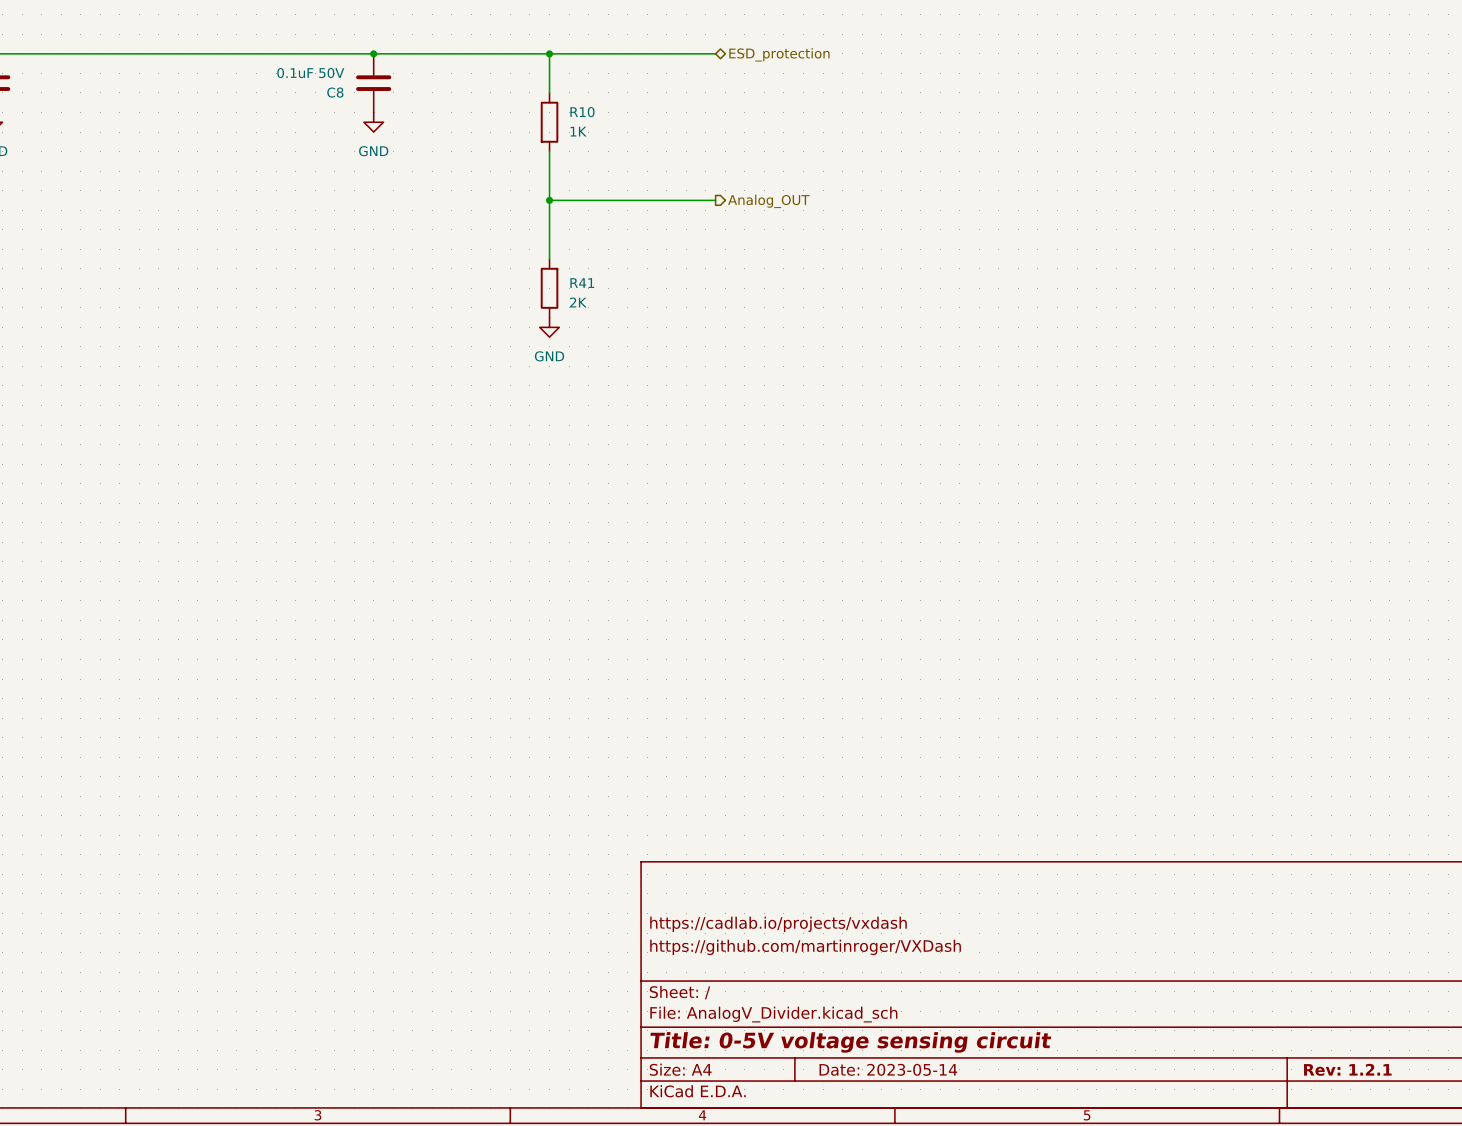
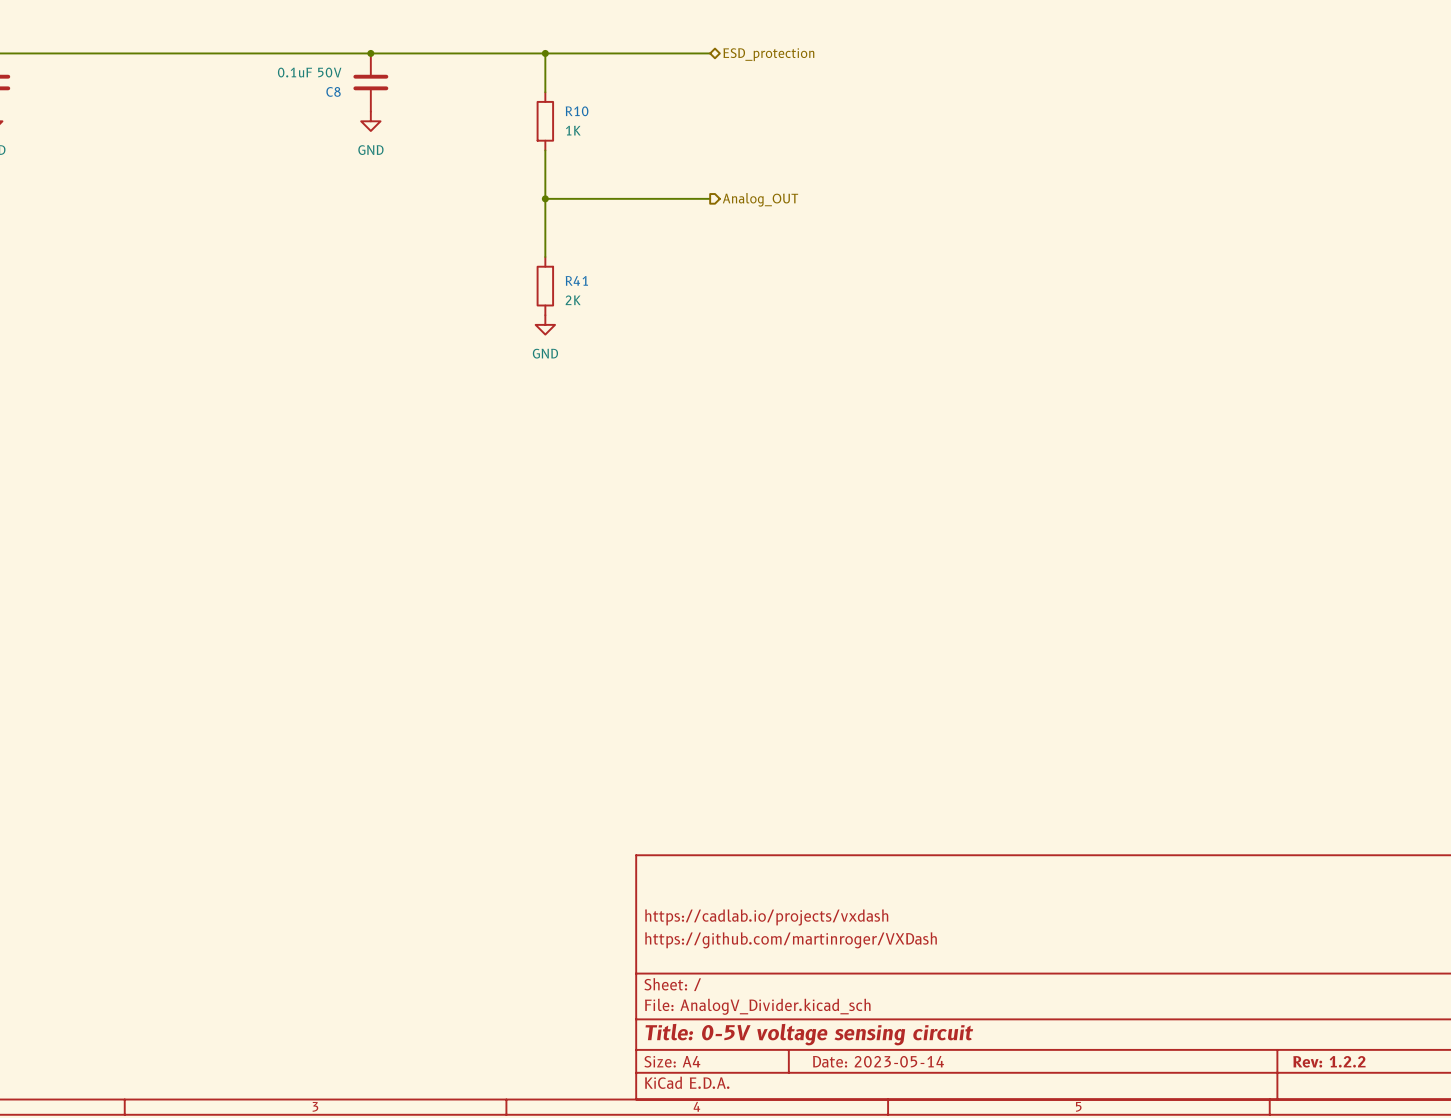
title block: Rev: 1.2.1 (1347, 1069) -> Rev: 1.2.2 (1329, 1061)

